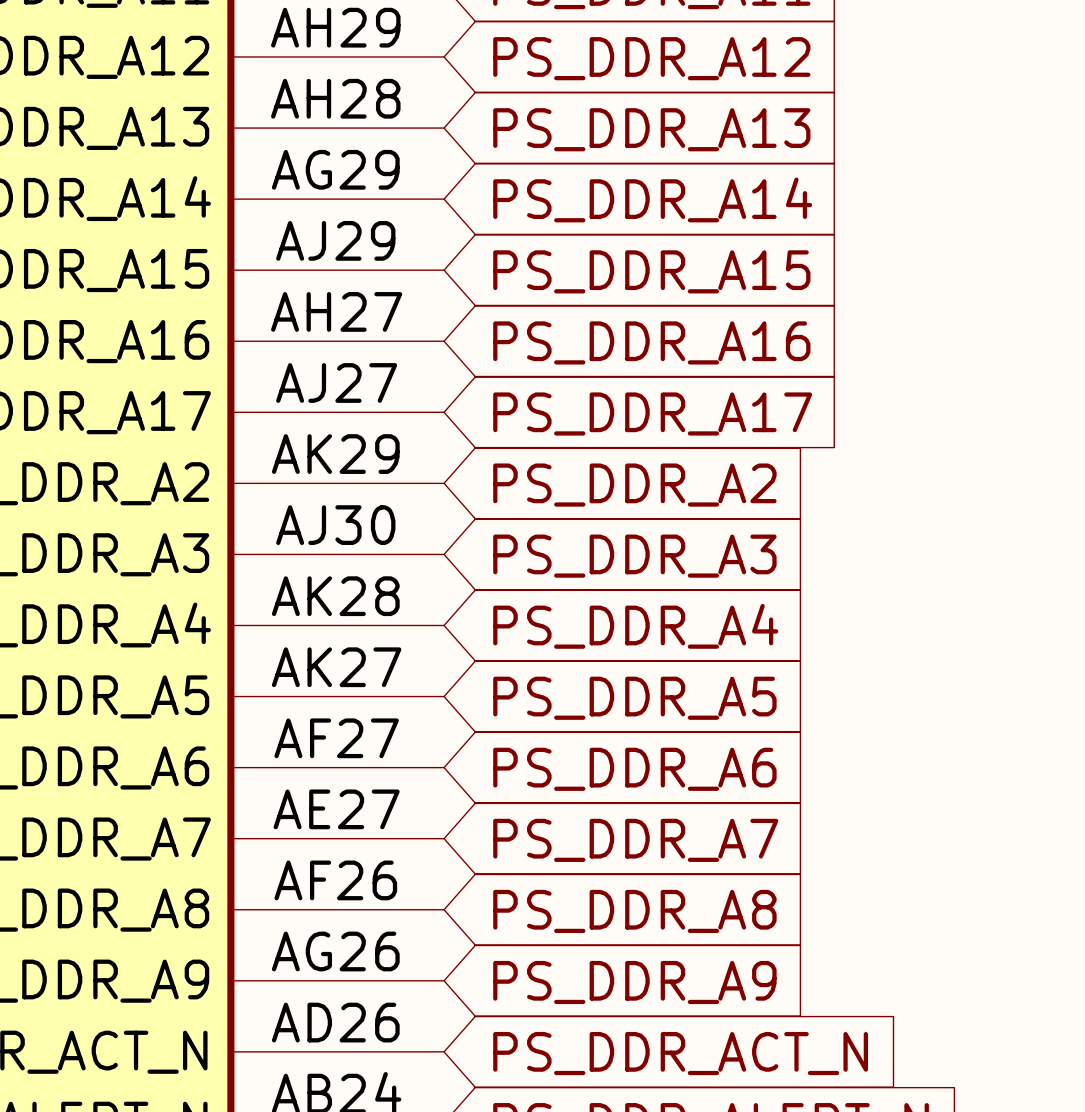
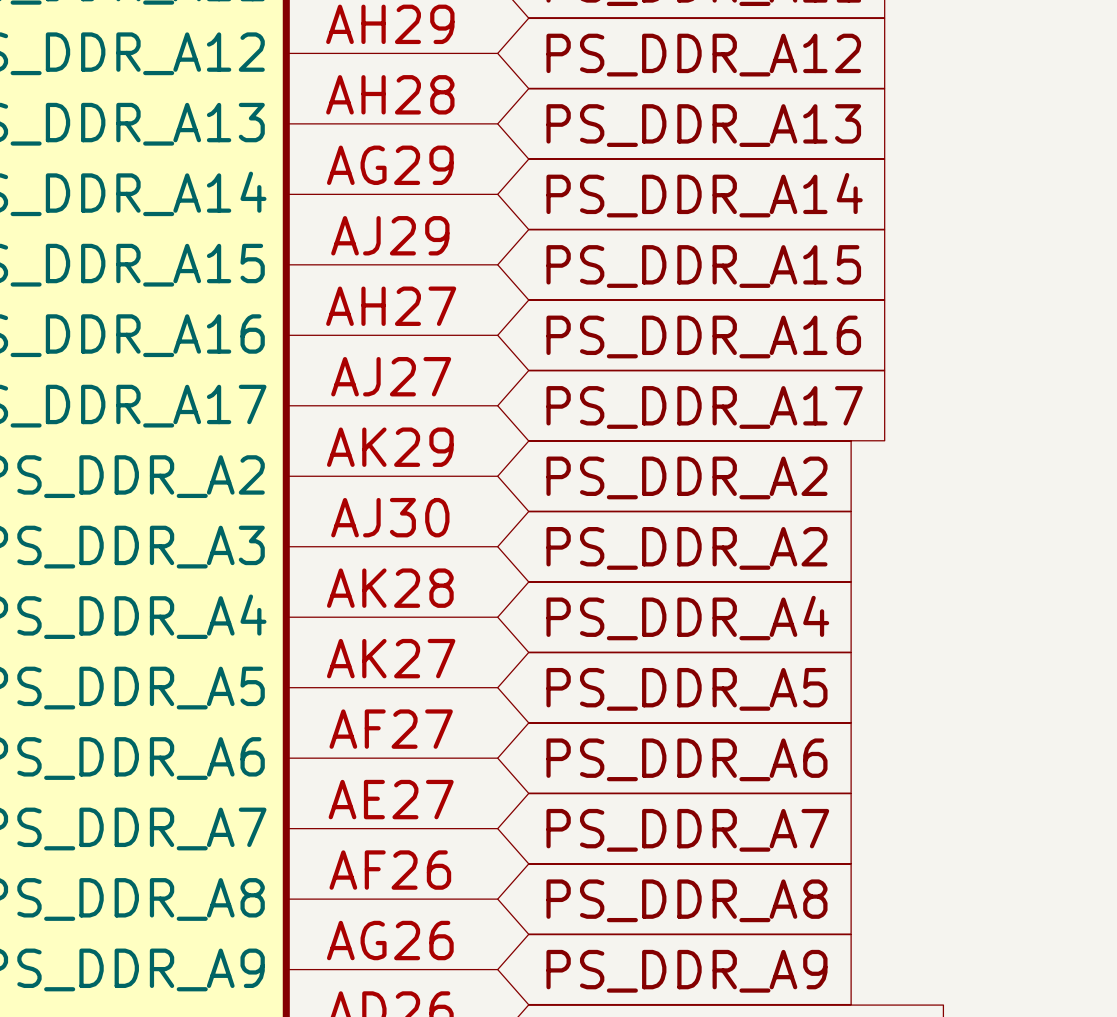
global label: PS_DDR_A3 (634, 556) -> PS_DDR_A2 (686, 548)

